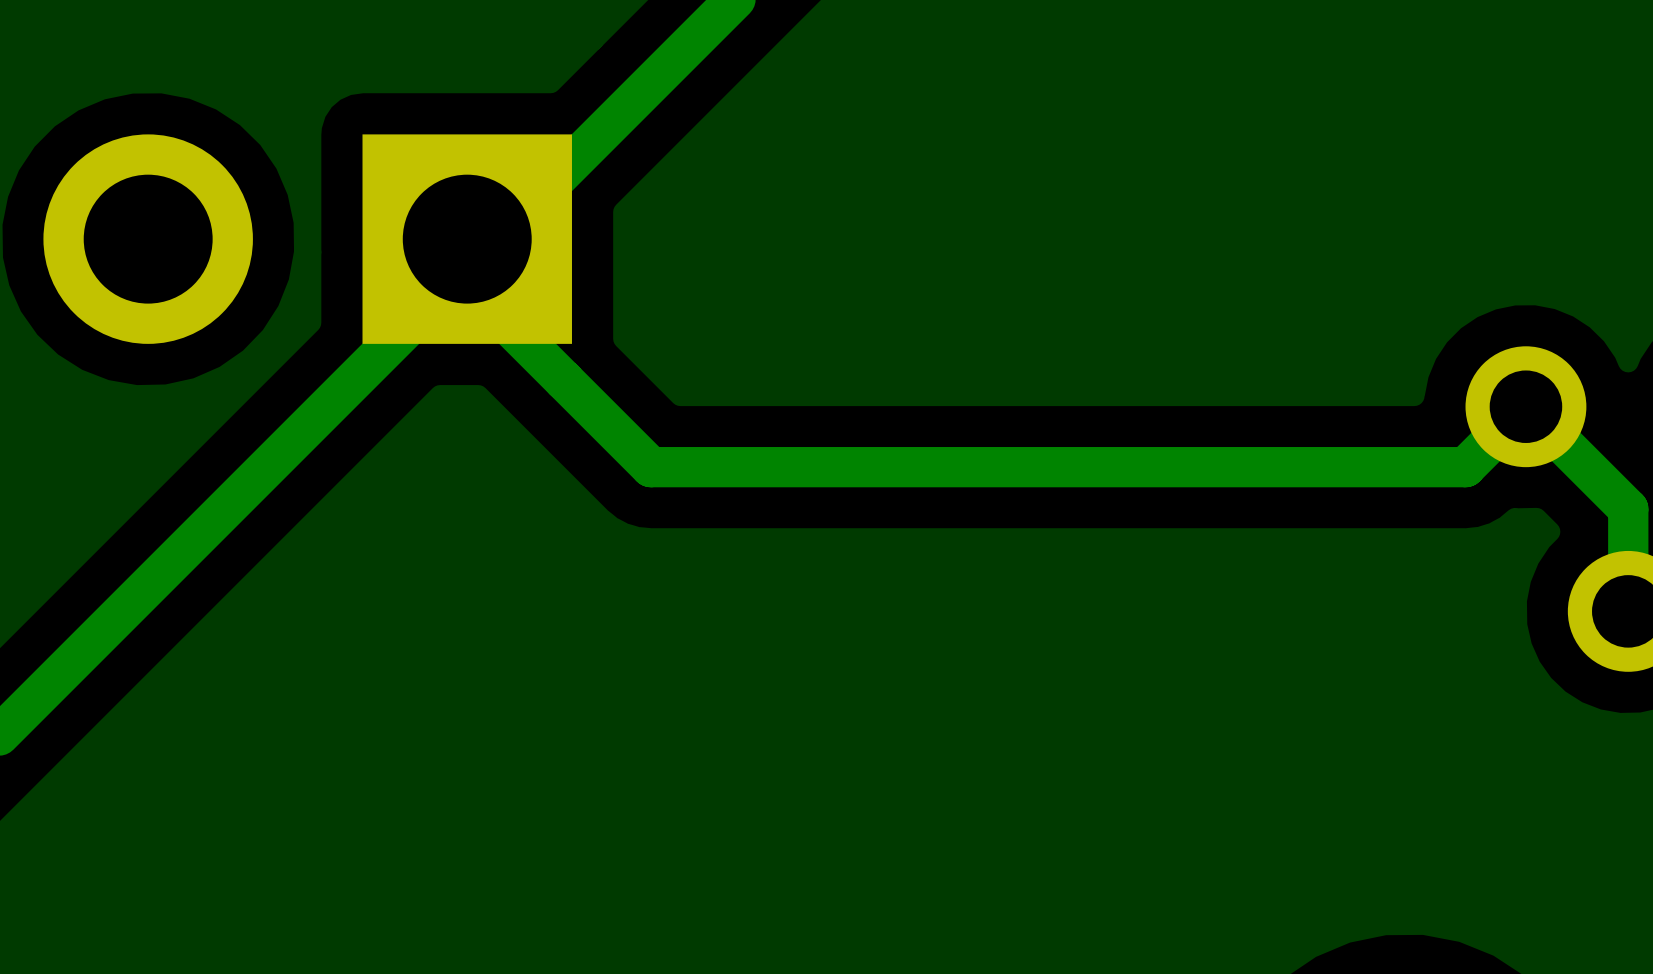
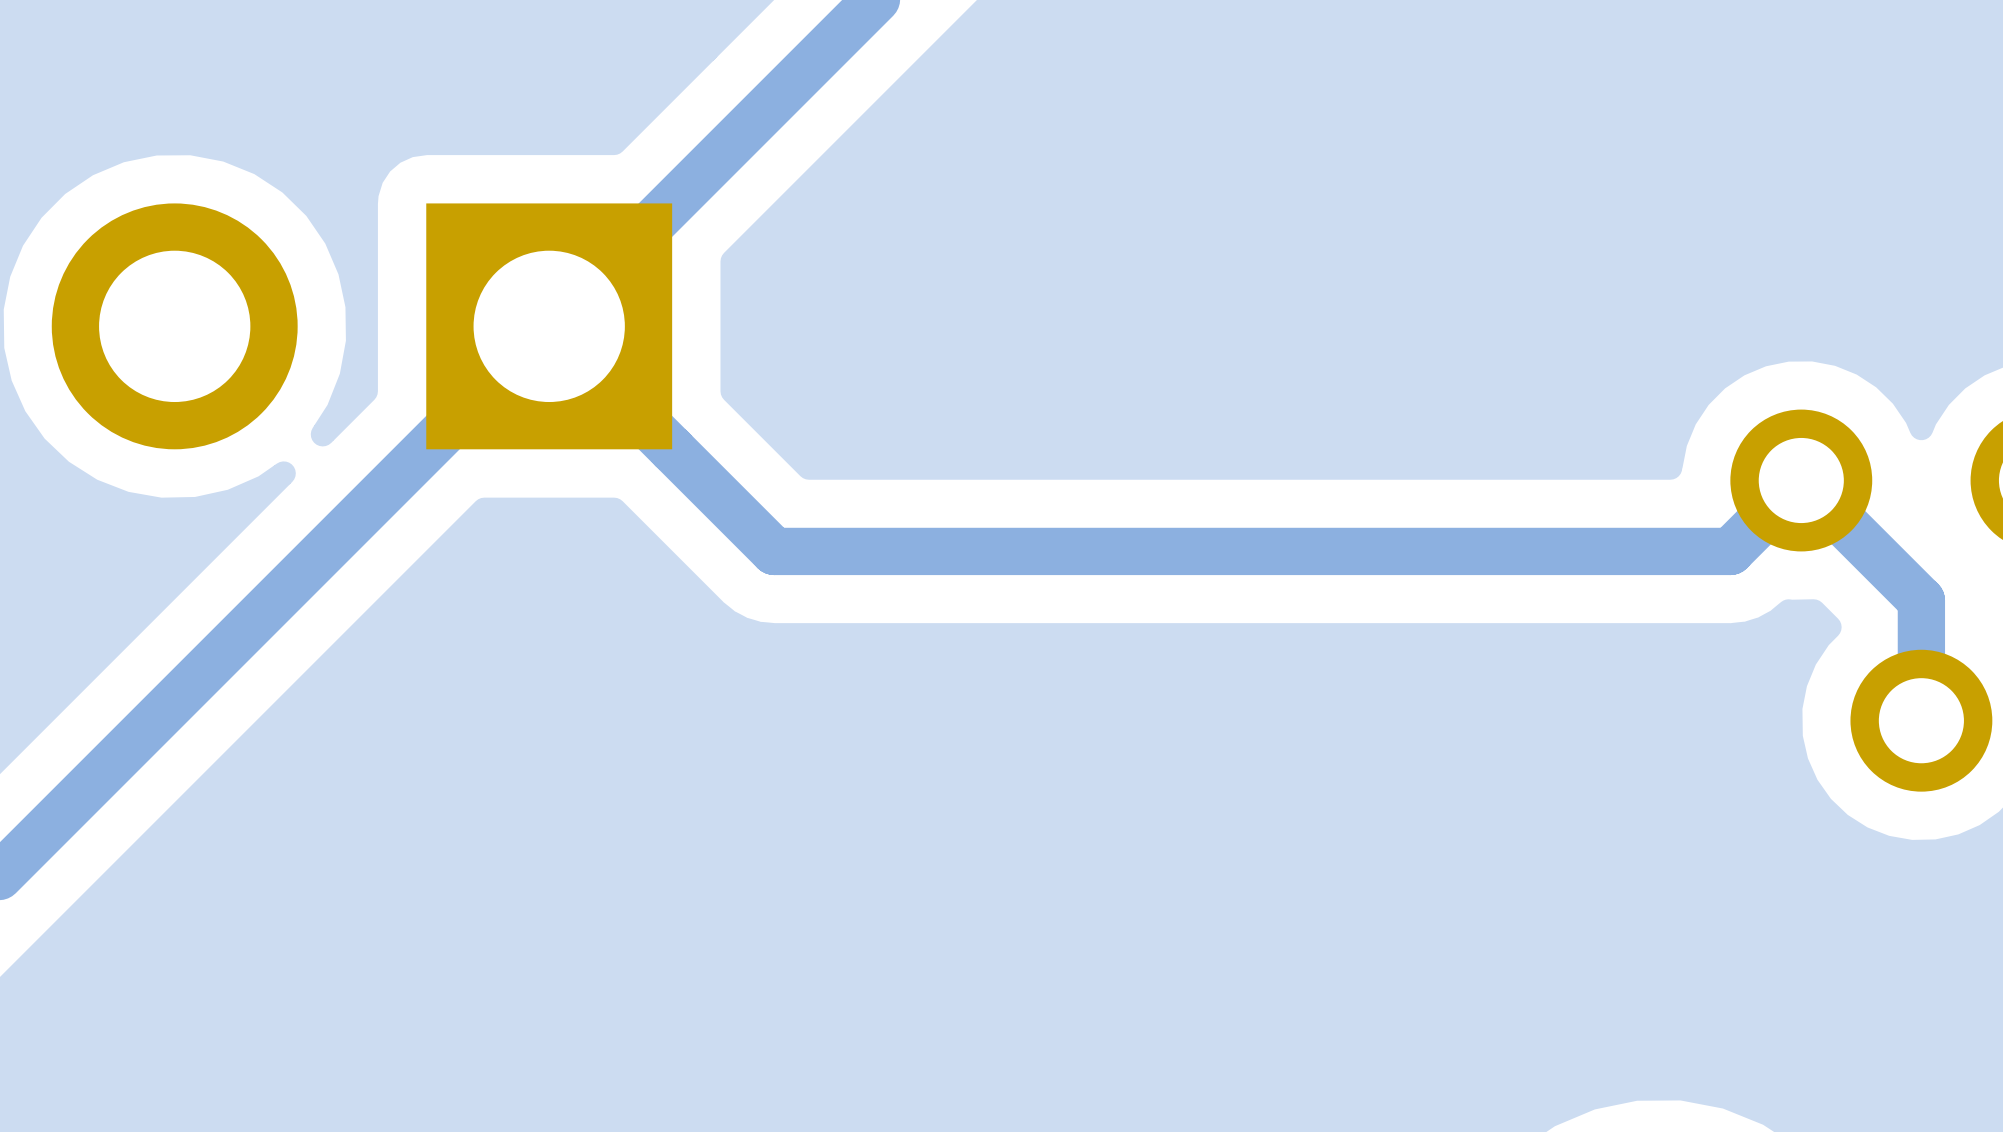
part position: (307, 239) -> (361, 326)

